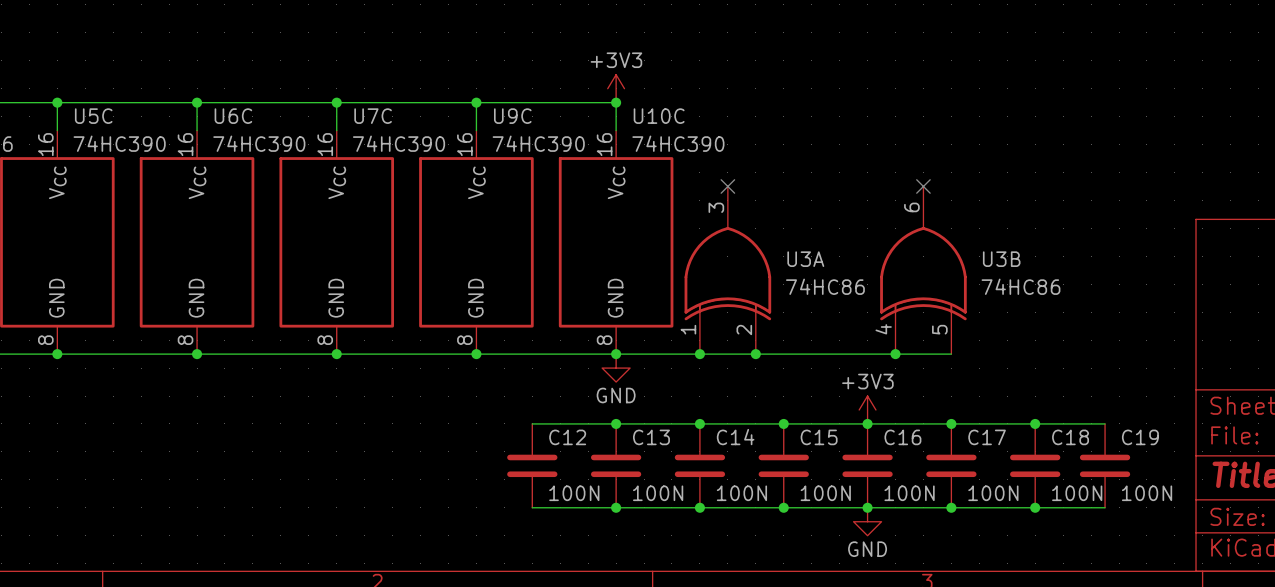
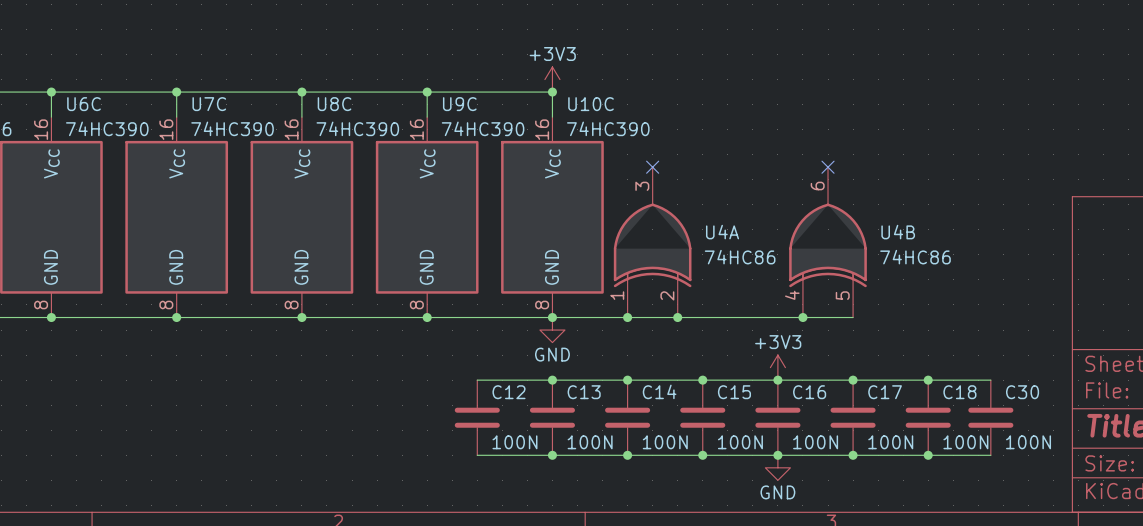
U5C name: U5C (93, 116) -> U6C (84, 104)
U6C name: U6C (233, 116) -> U7C (209, 104)
U7C name: U7C (373, 116) -> U8C (334, 104)
U3A name: U3A (805, 259) -> U4A (722, 232)
U3B name: U3B (1001, 259) -> U4B (898, 232)
C19 name: C19 (1140, 437) -> C30 (1022, 392)

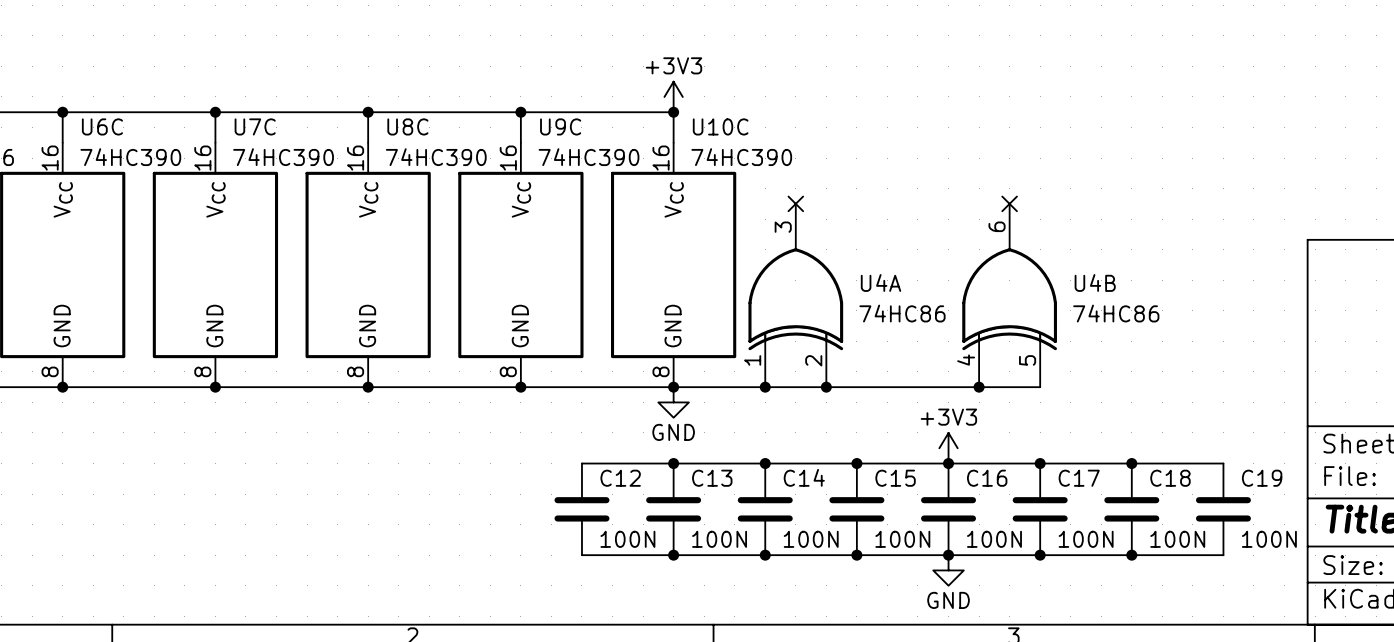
wire: none -> (1208, 463) (1223, 463)
C30: 100N (990, 417) -> none
C19: none -> 100N (1223, 509)
wire: none -> (1208, 555) (1223, 555)

